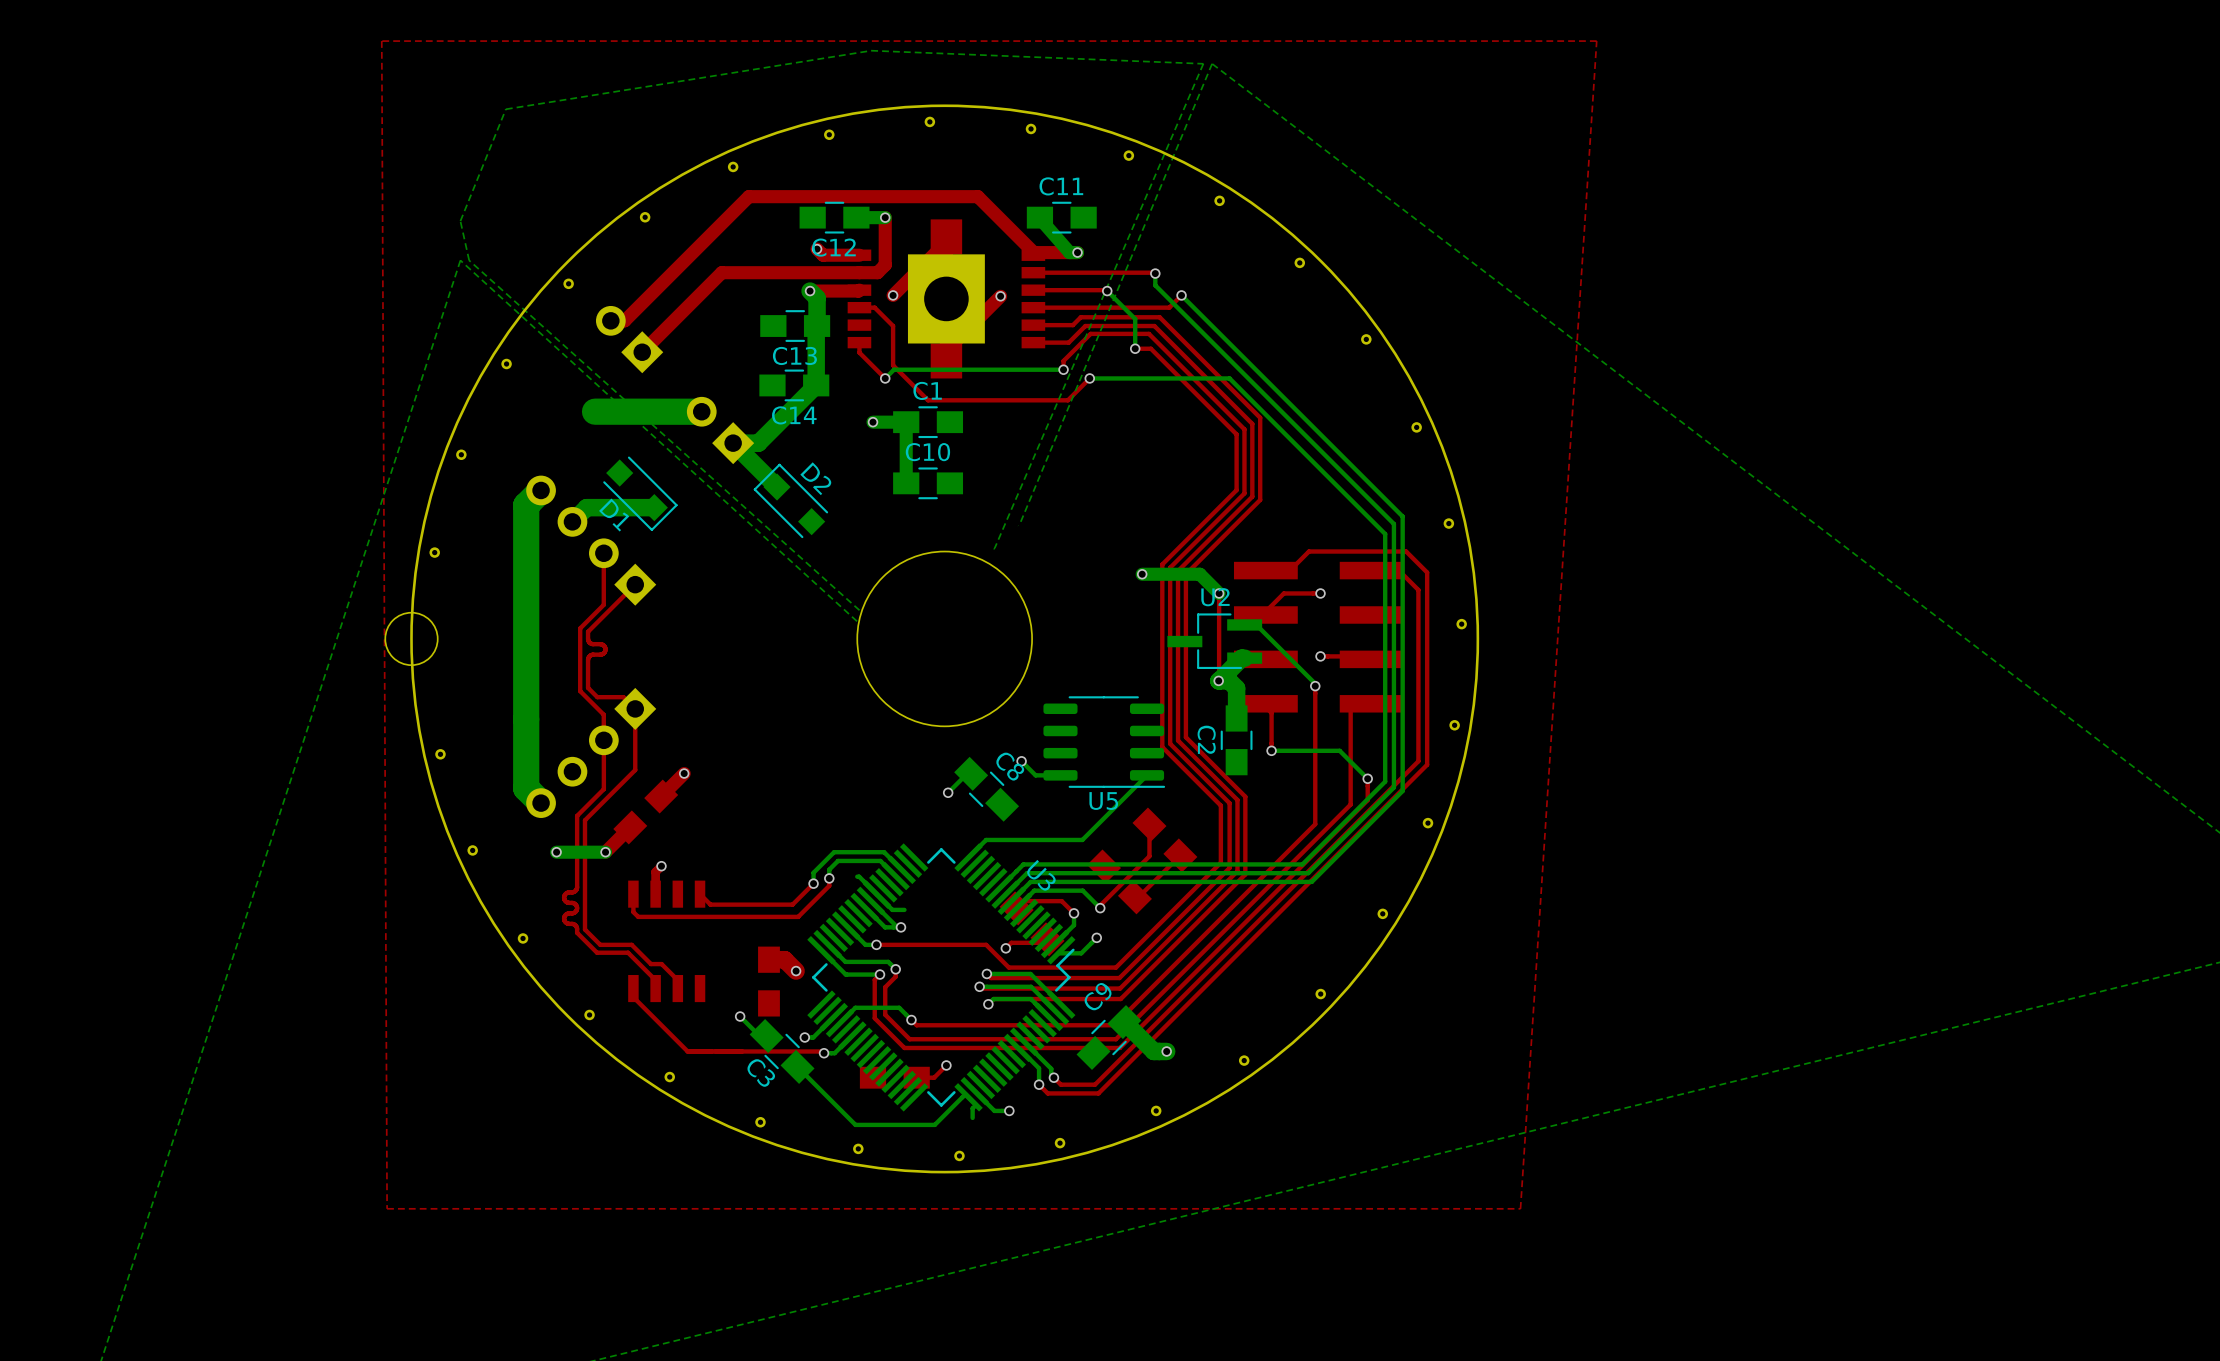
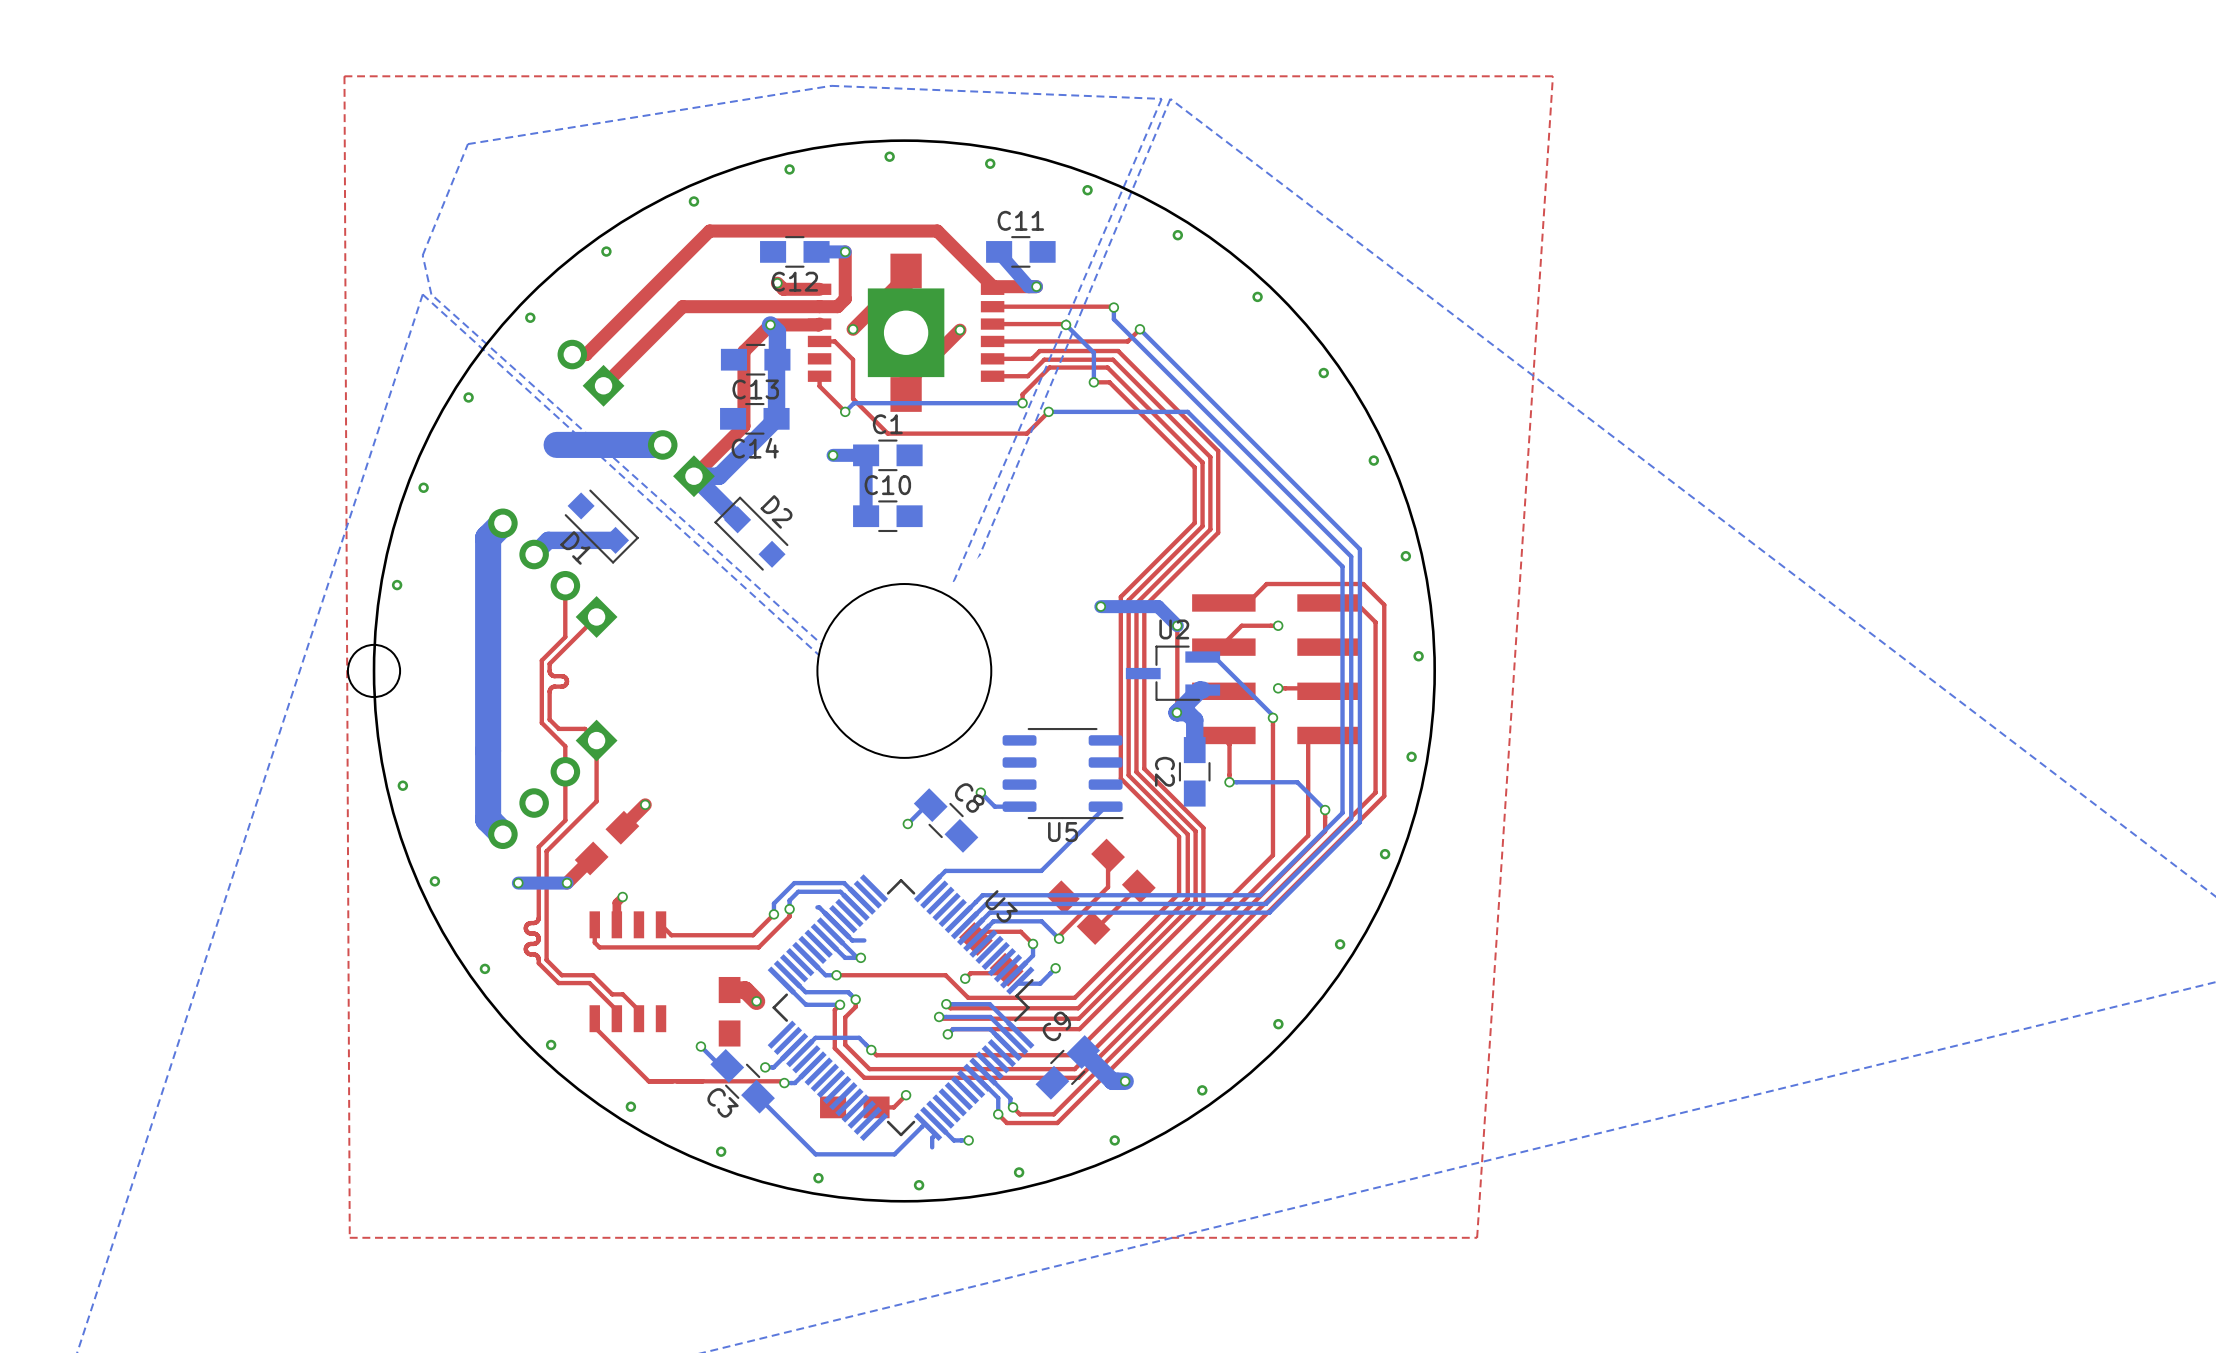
top track: none -> (770, 324) (743, 351) (743, 426) (693, 476)

